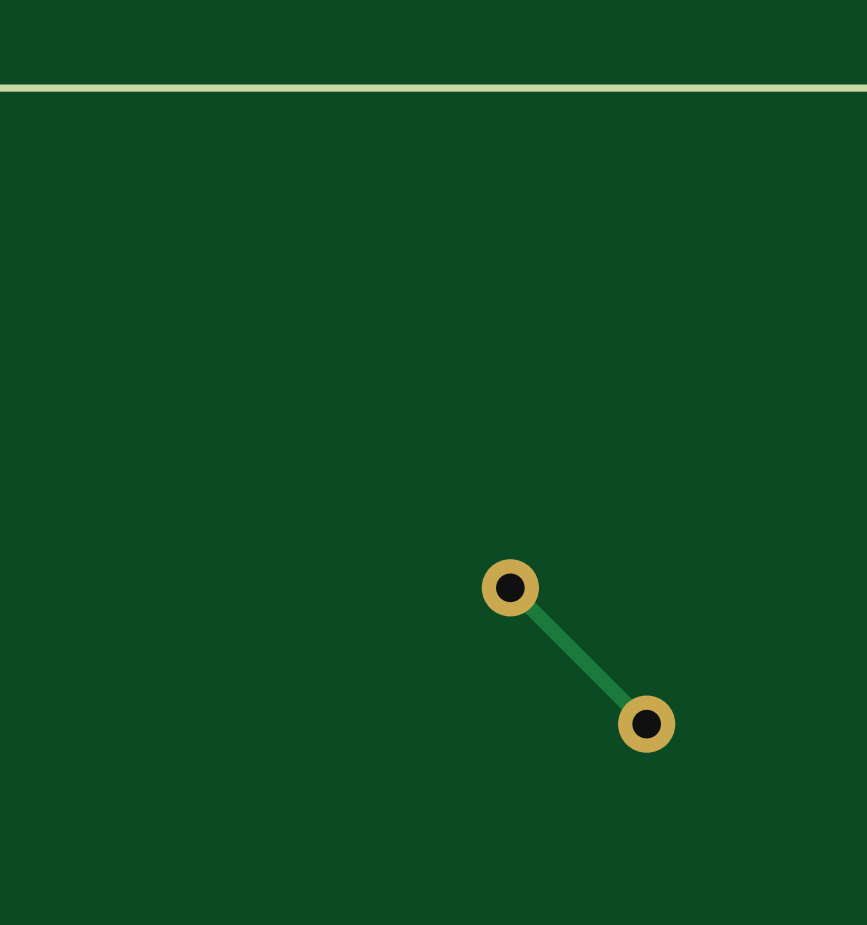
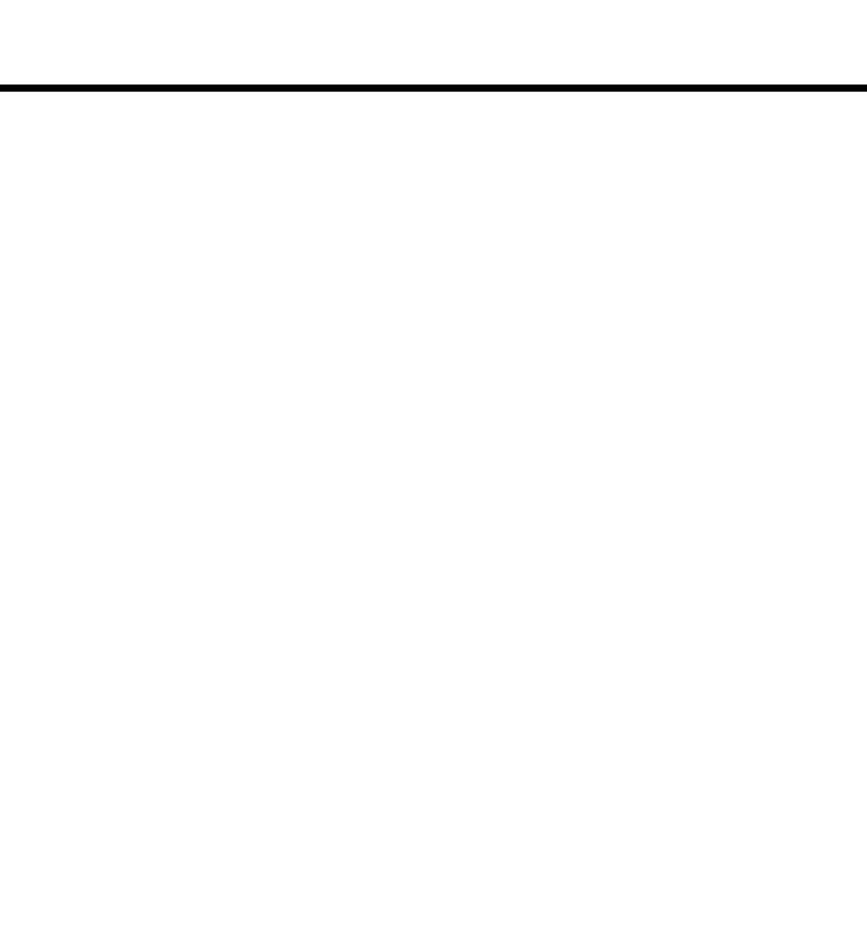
track: (510, 587) (646, 724) -> none
via: (510, 587) -> none
via: (646, 724) -> none

